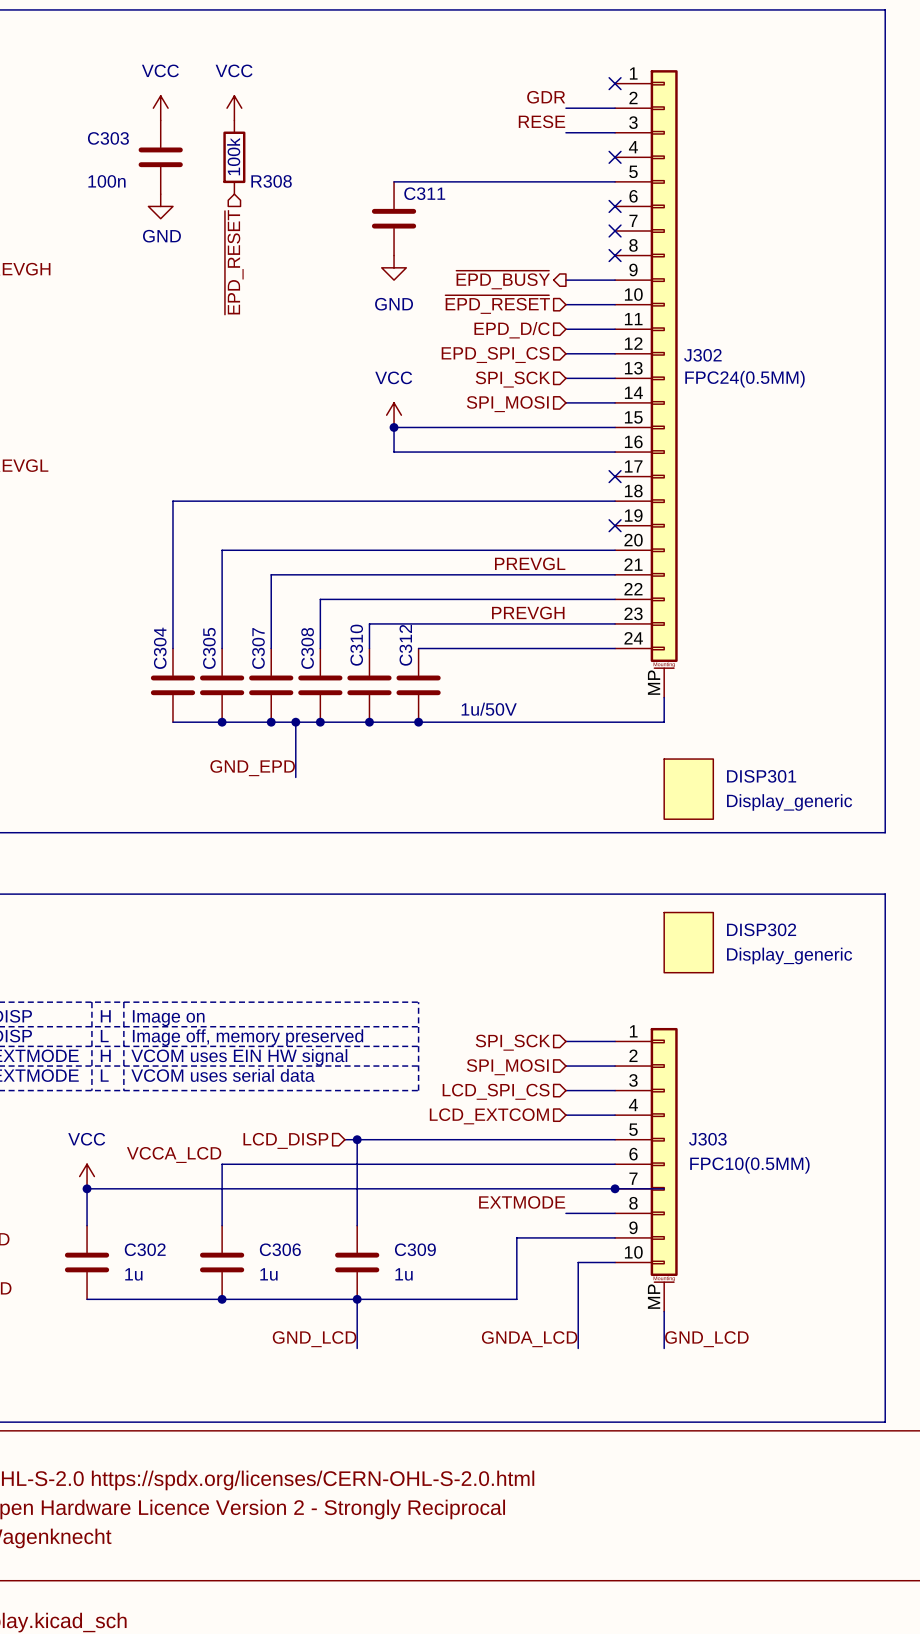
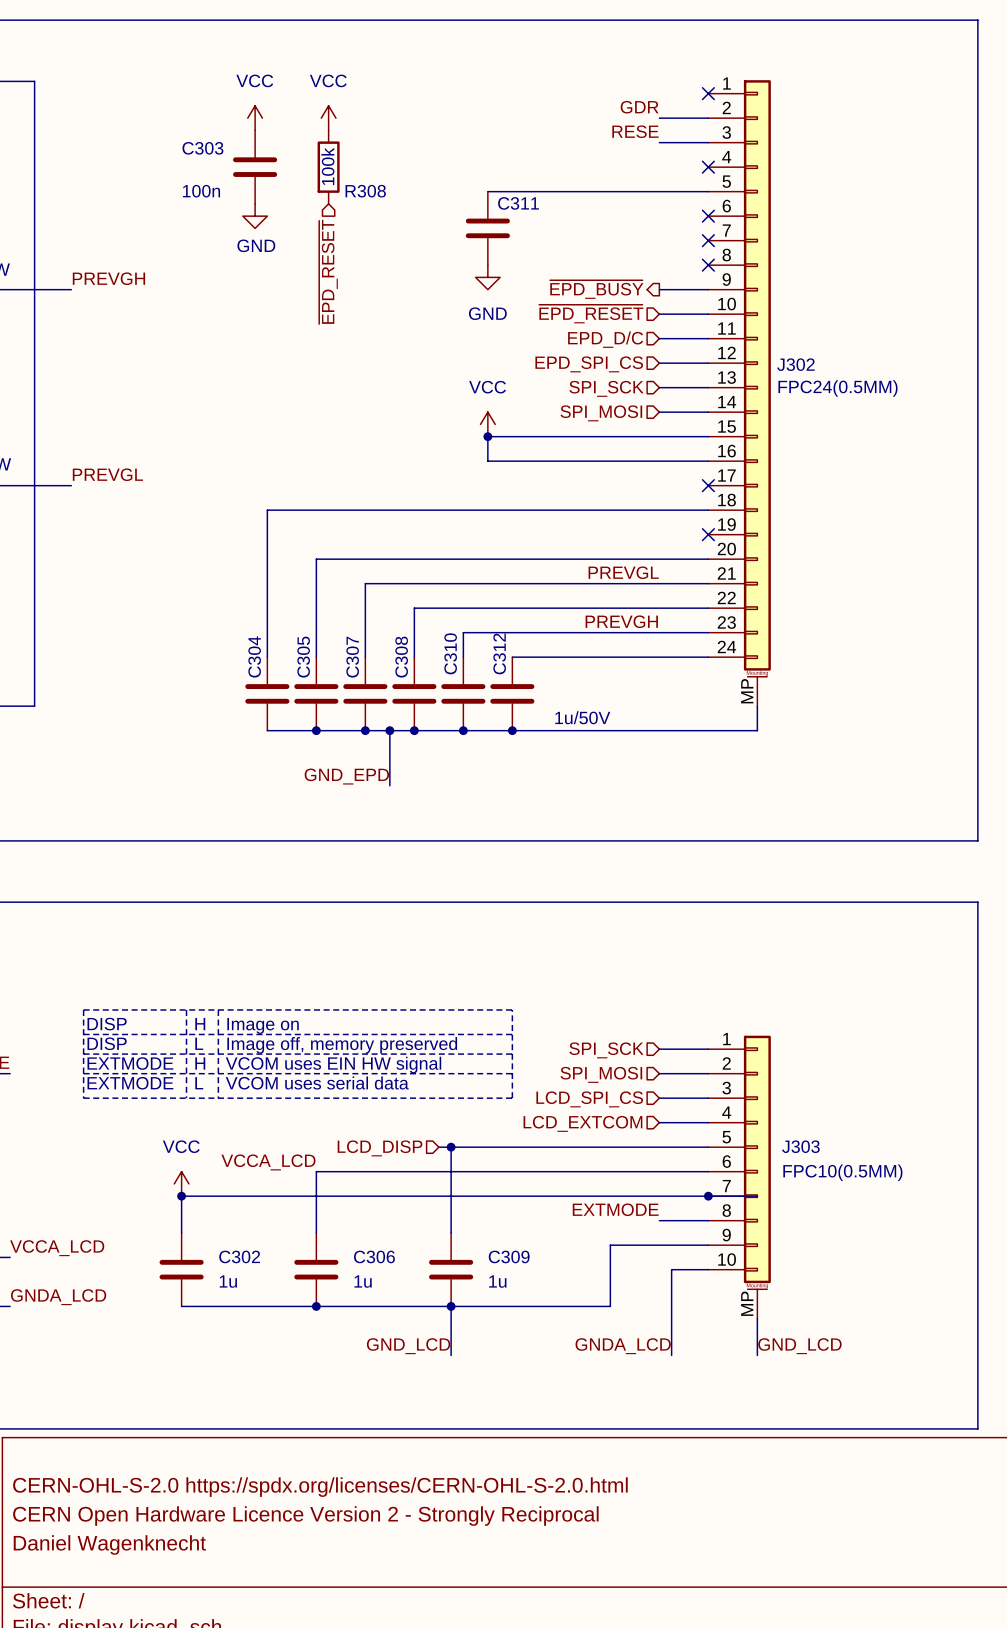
DISP301: Display_generic (688, 789) -> none
DISP302: Display_generic (688, 942) -> none

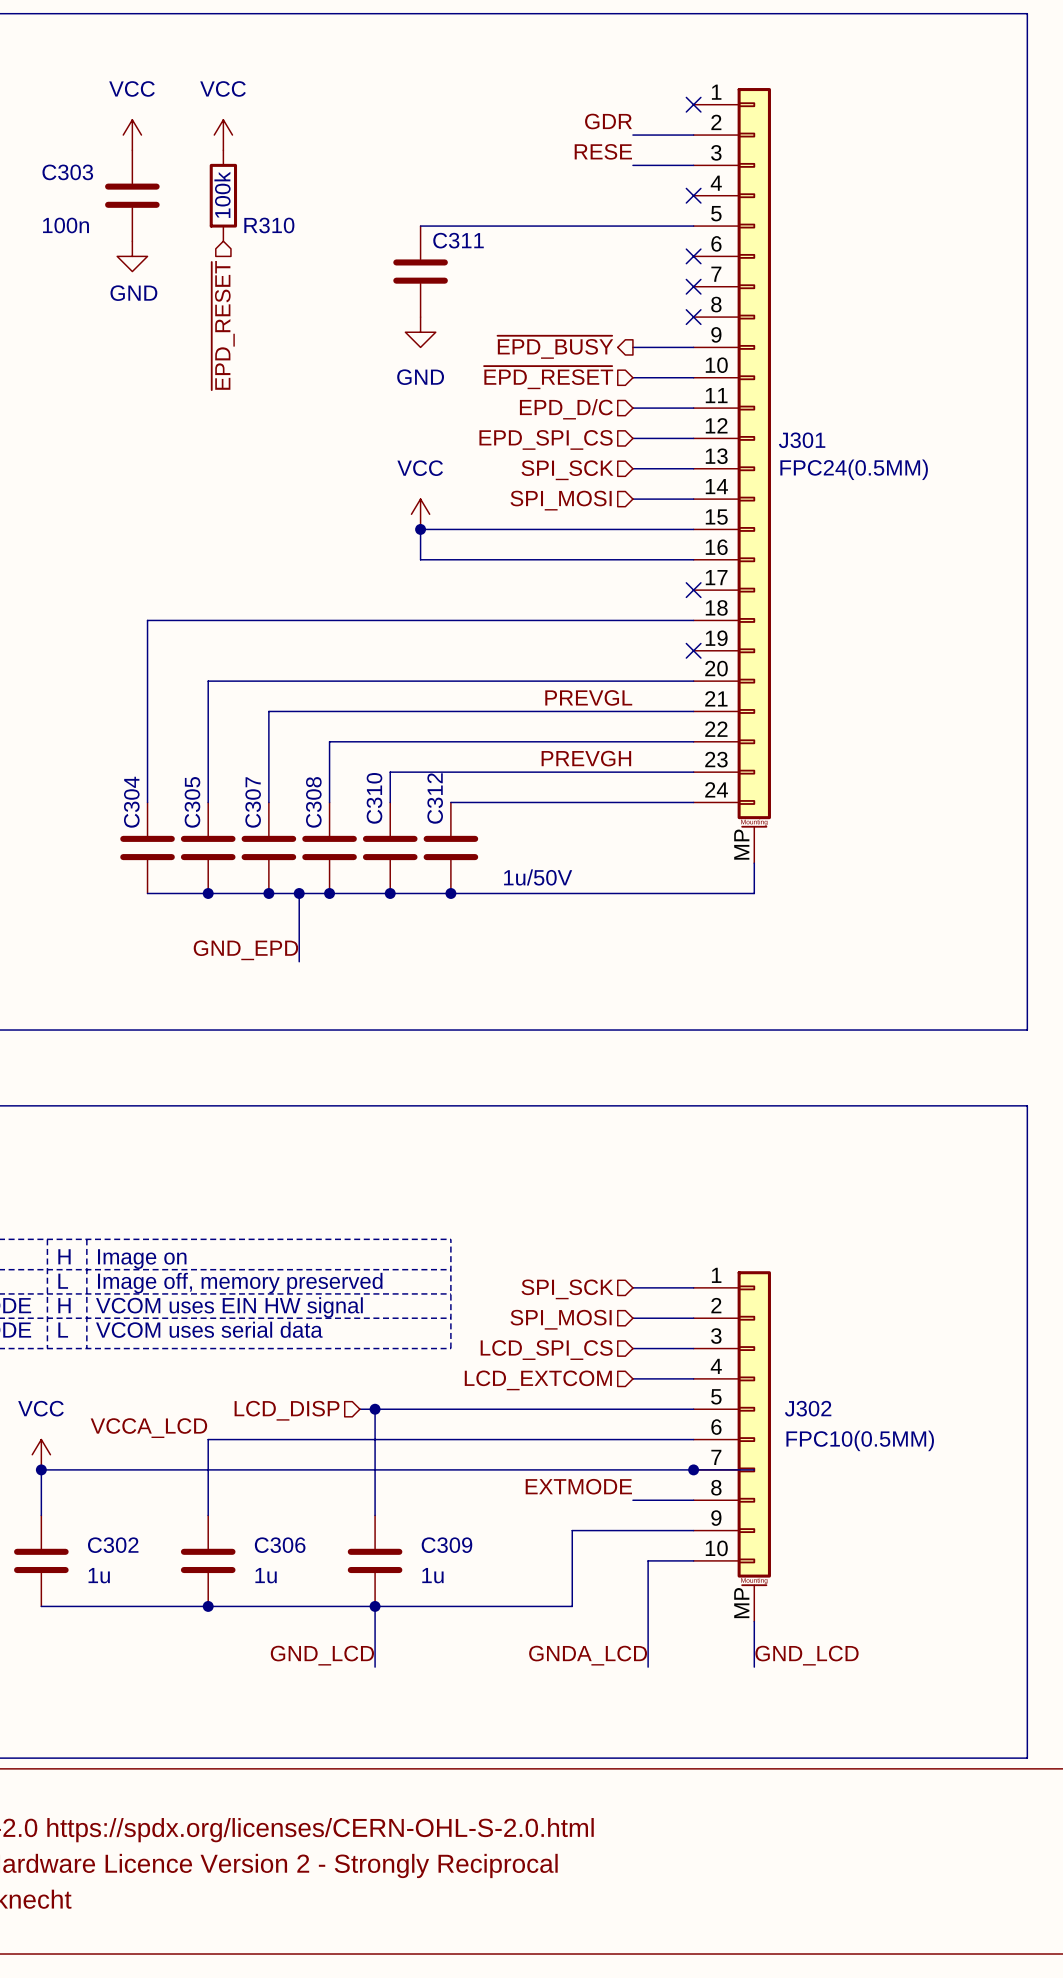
R308 name: R308 (365, 191) -> R310 (269, 225)
J302 name: J302 (795, 364) -> J301 (802, 440)
J303 name: J303 (800, 1146) -> J302 (808, 1408)

